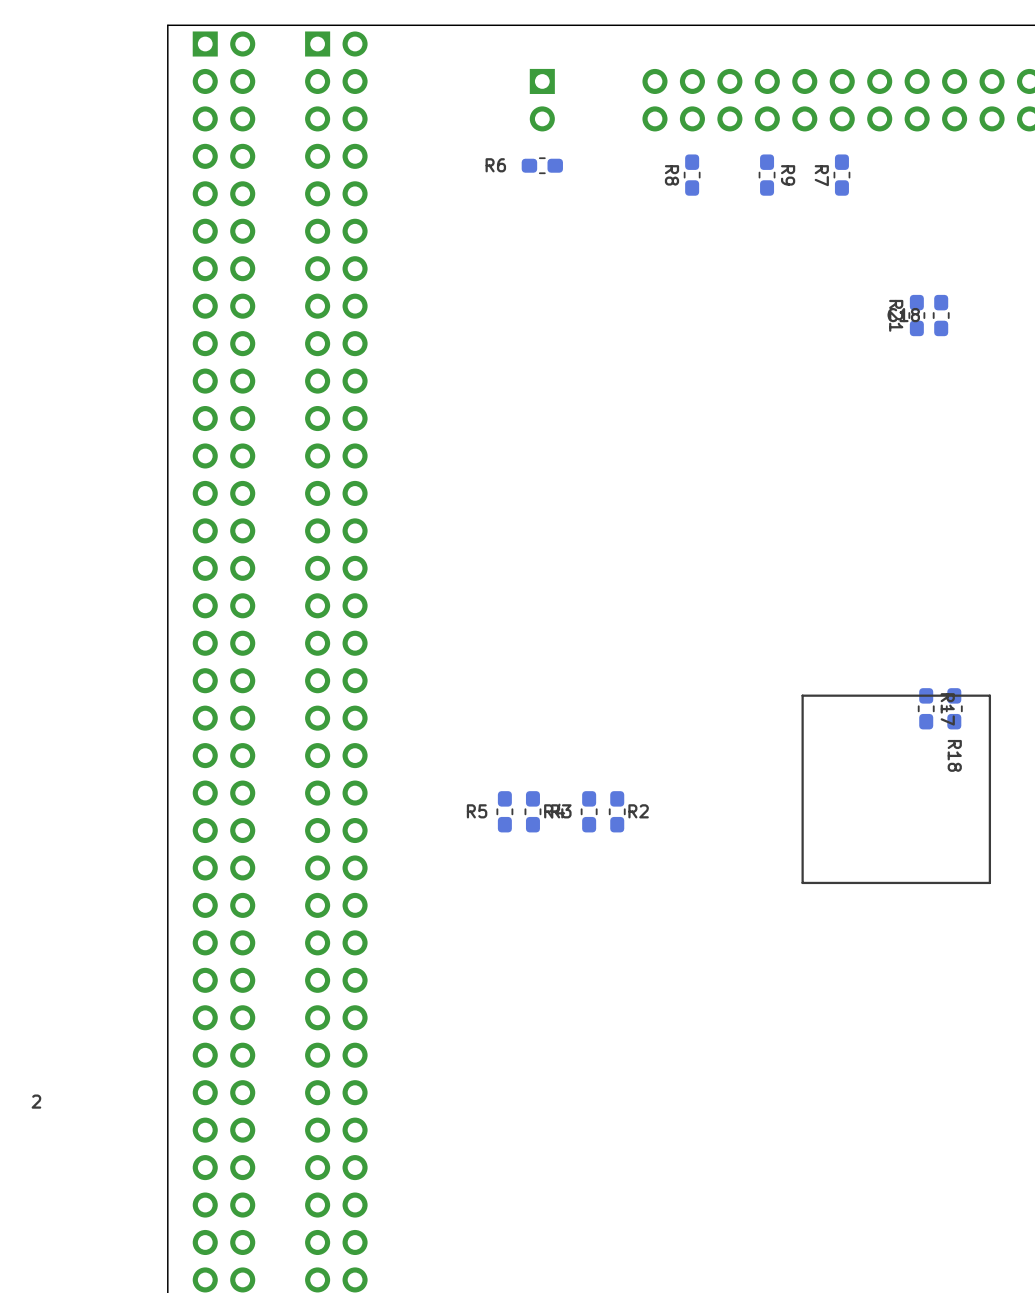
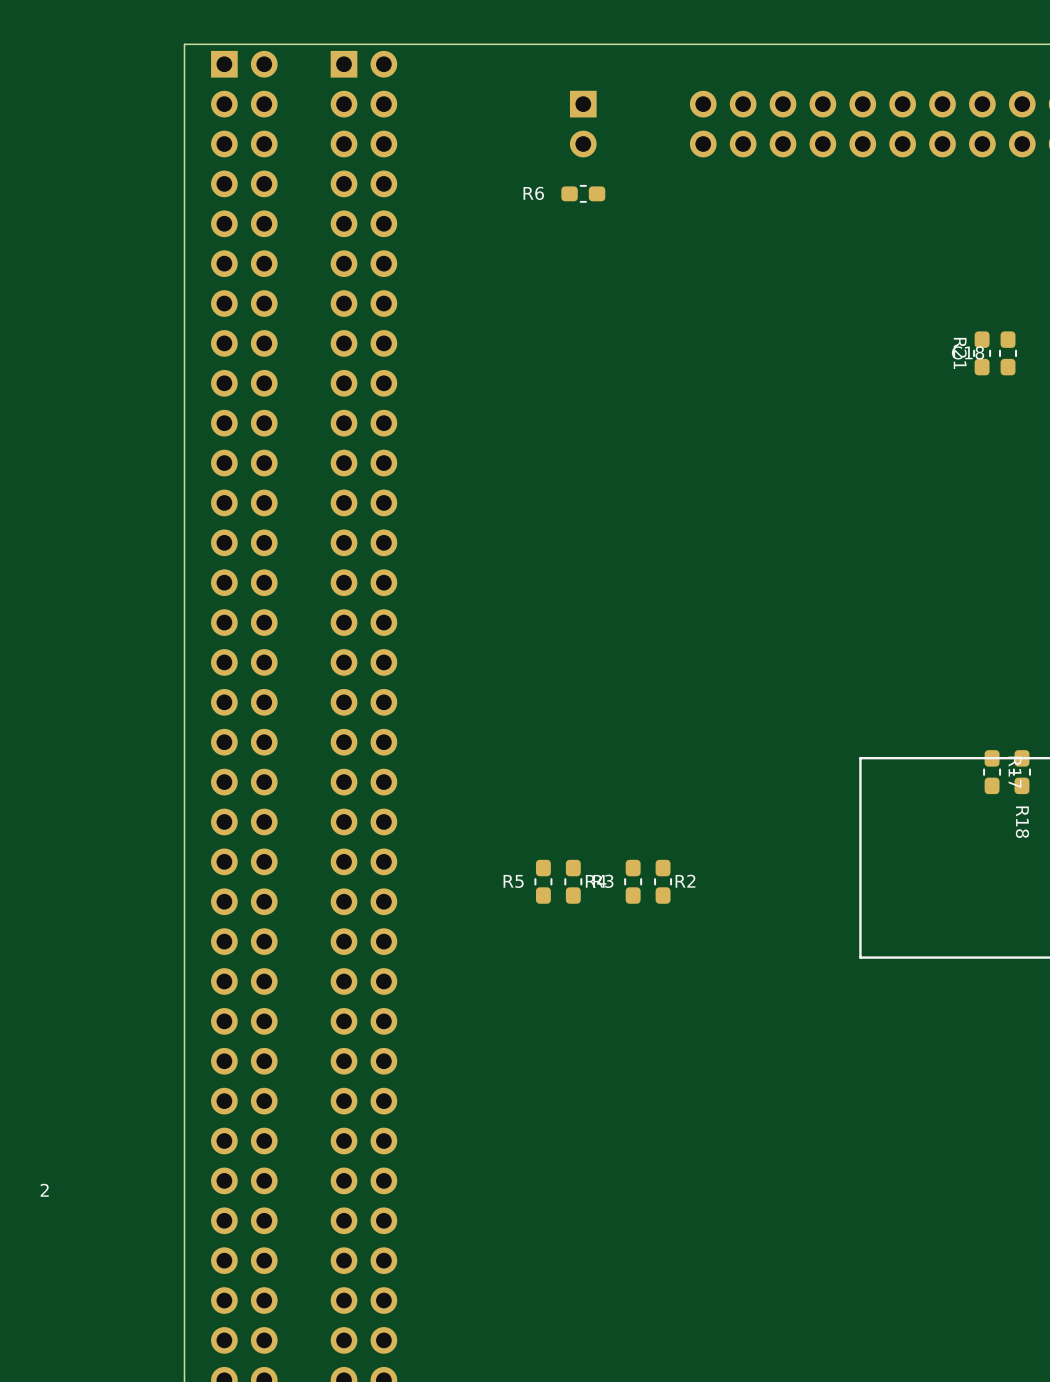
R8: (692, 175) -> none
R9: (767, 175) -> none
R7: (841, 175) -> none

